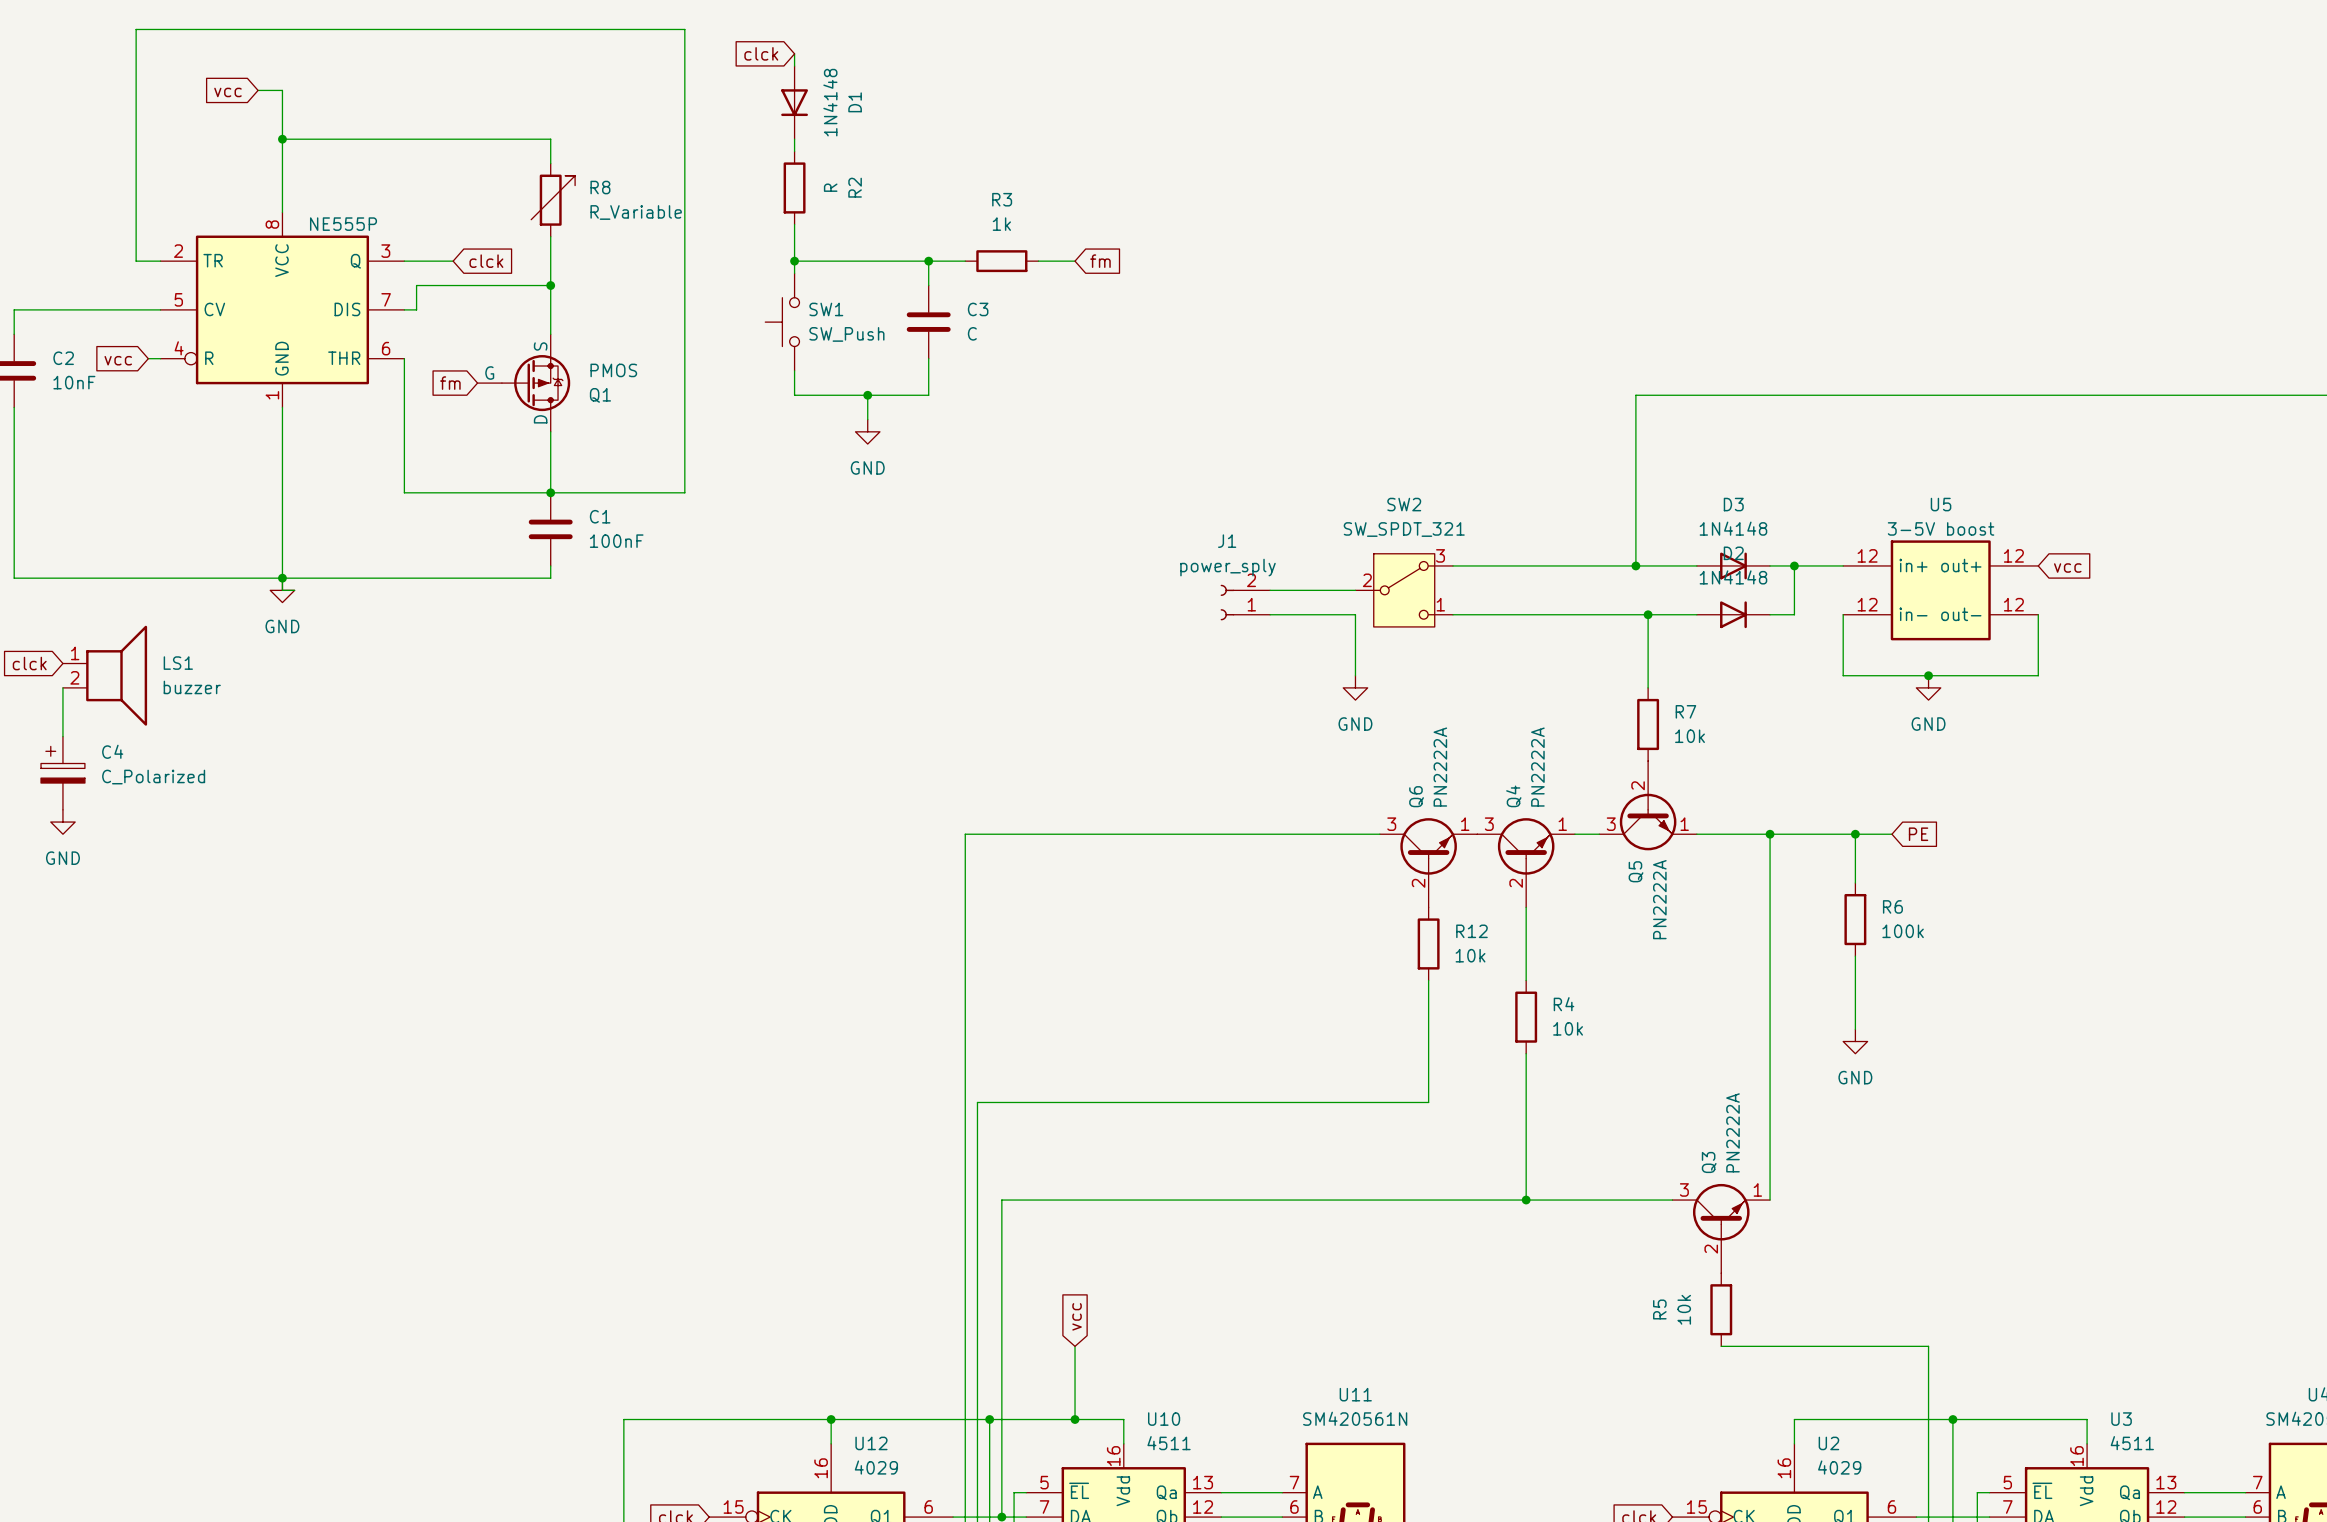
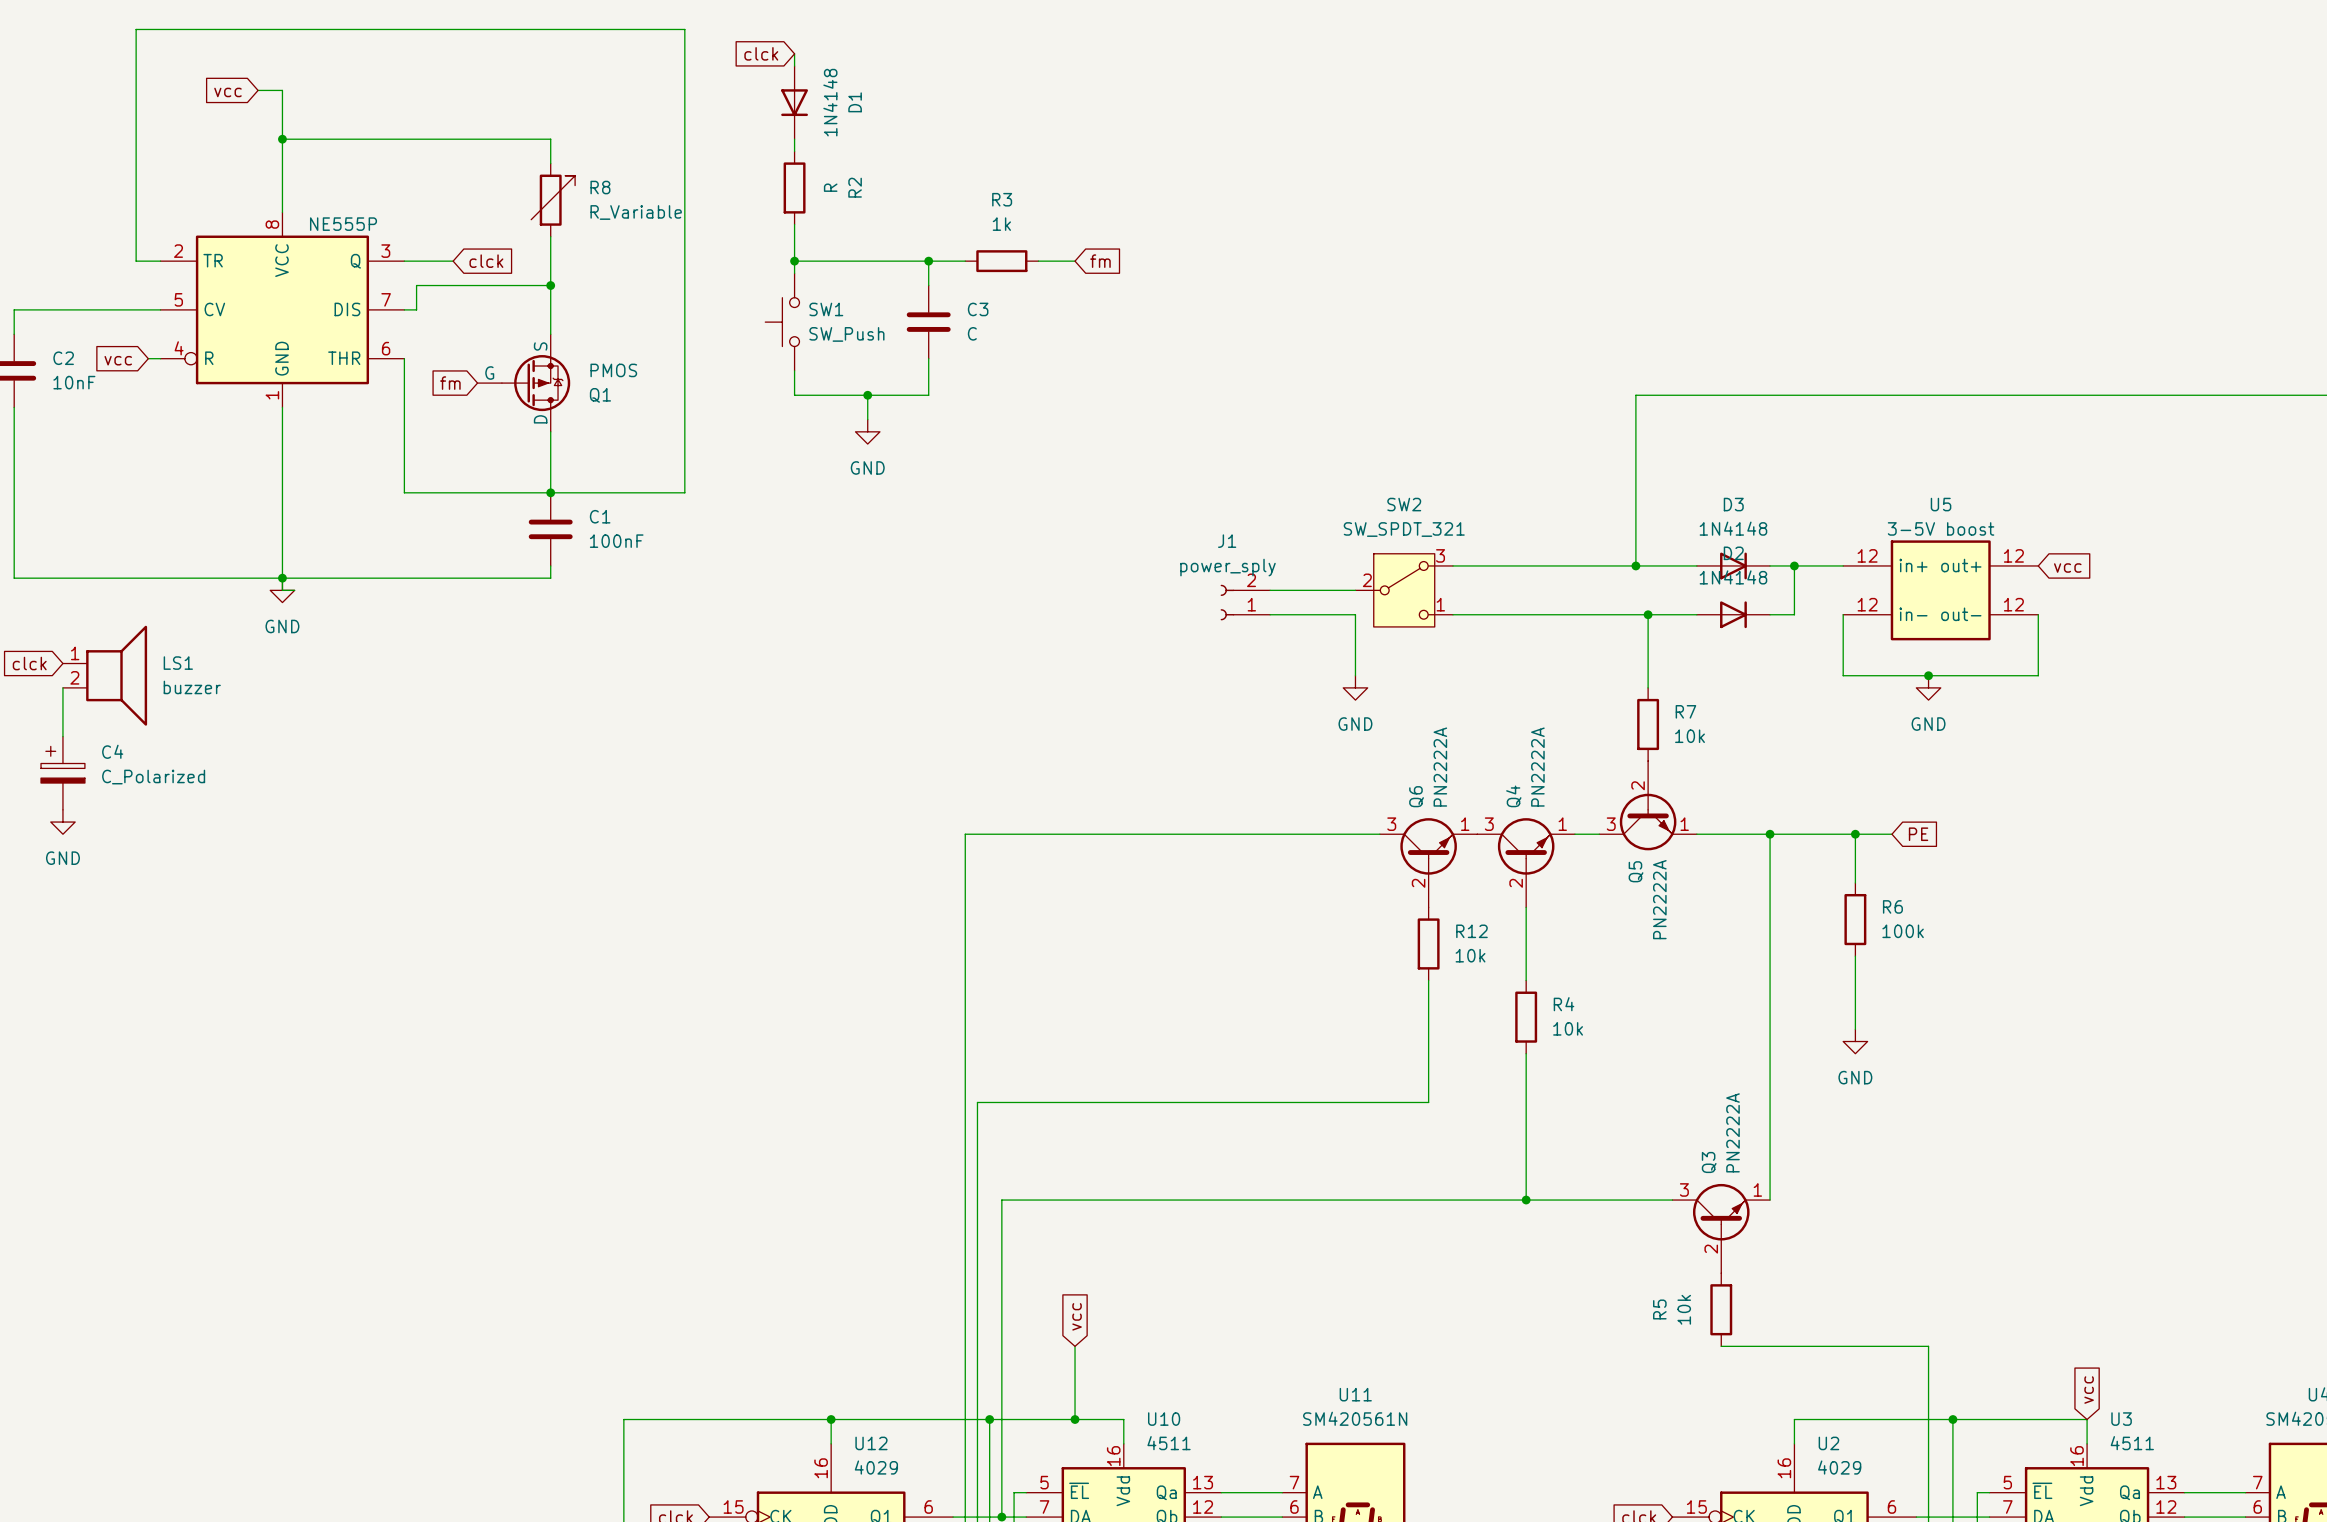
global label: none -> vcc (2089, 1390)

